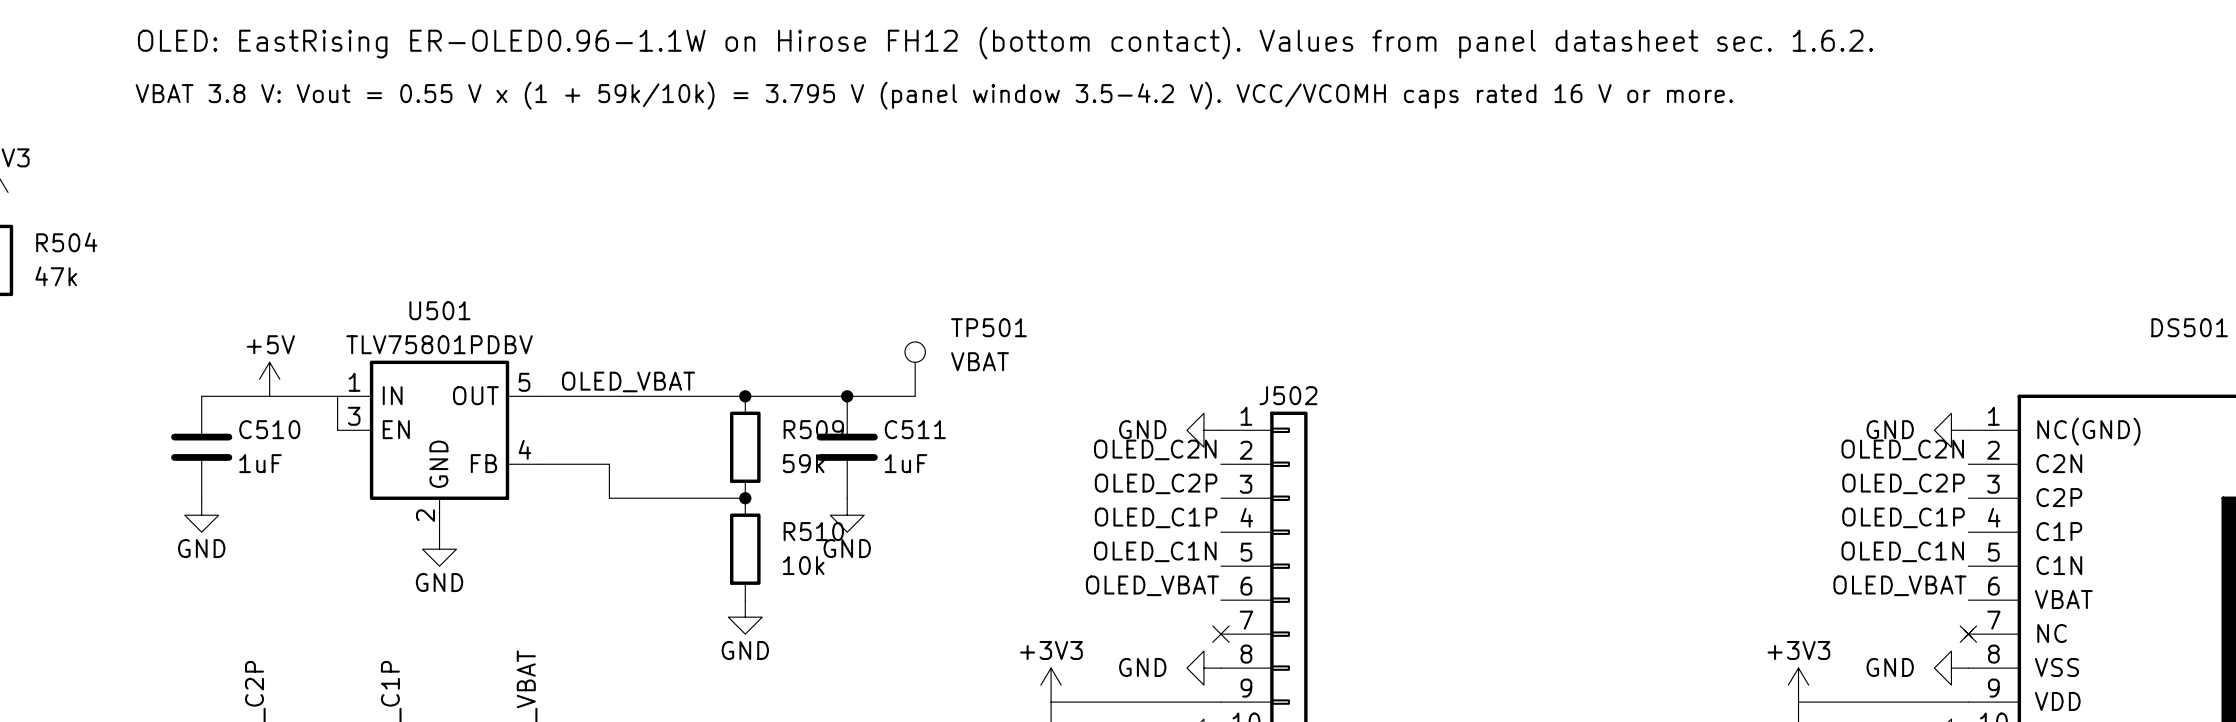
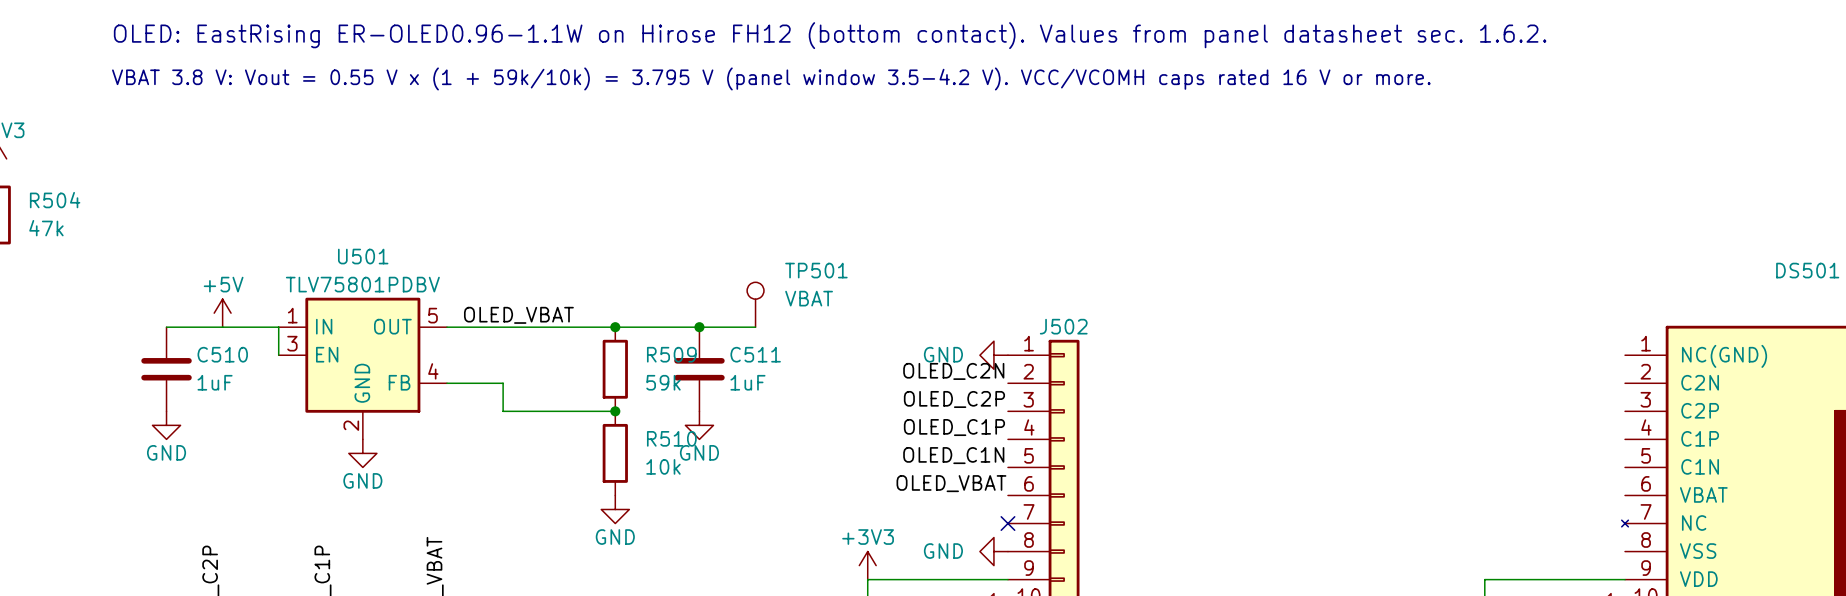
power symbol: GND (1951, 430) -> none
label: OLED_C2N (1902, 449) -> none
label: OLED_C2P (1903, 483) -> none
label: OLED_C1P (1903, 517) -> none
label: OLED_C1N (1902, 551) -> none
label: OLED_VBAT (1899, 585) -> none
no-connect mark: (1968, 634) -> none
power symbol: GND (1951, 668) -> none
power symbol: +3V3 (1798, 685) -> none

